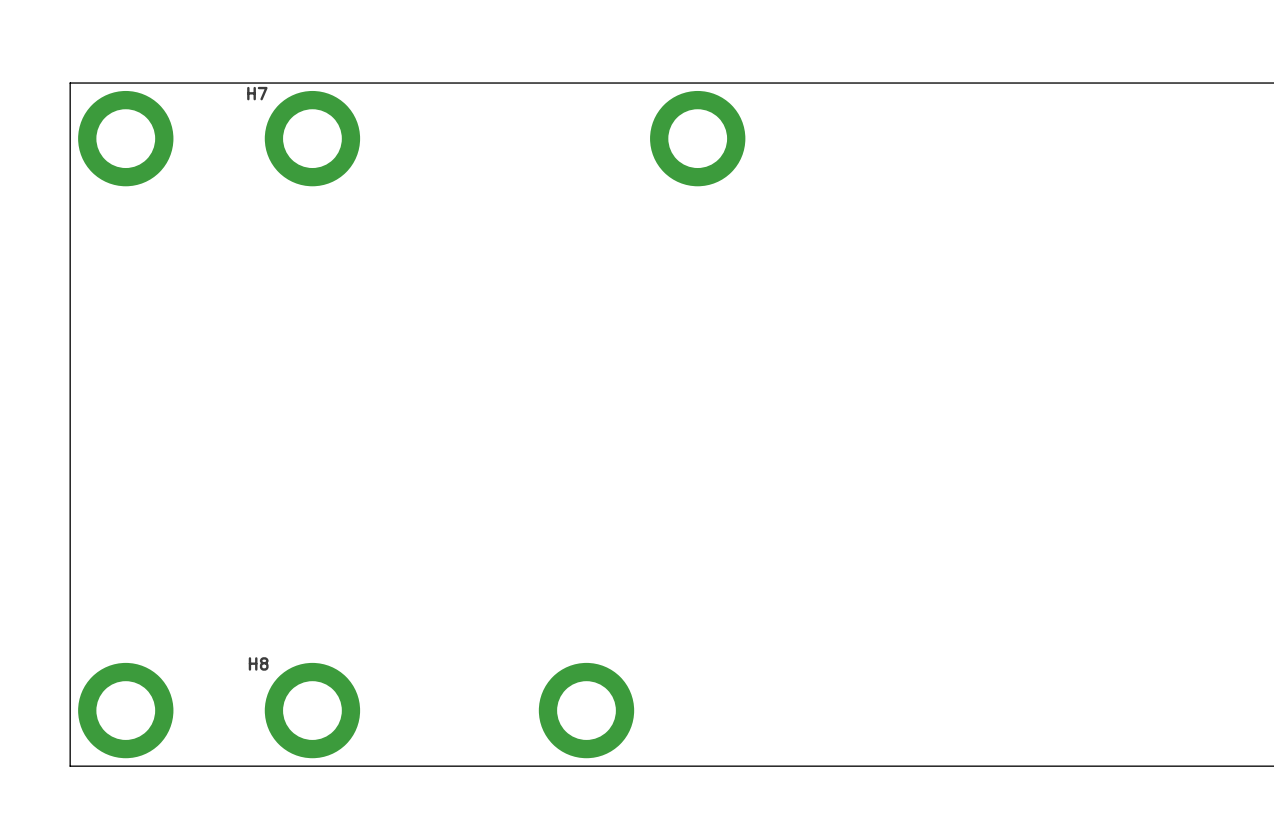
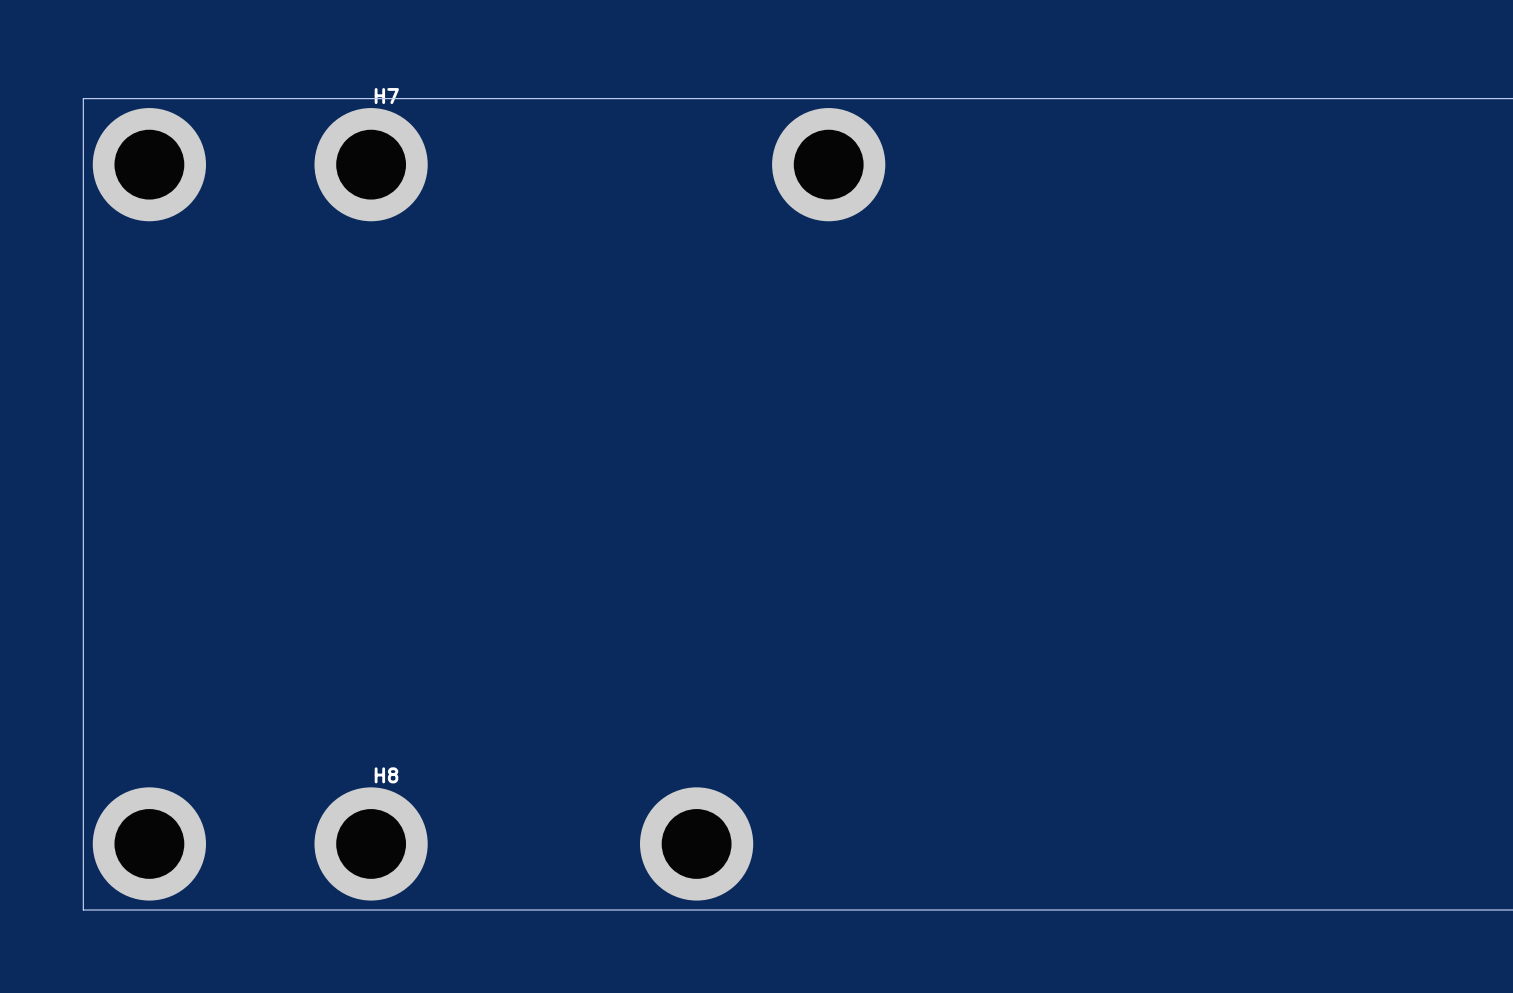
H7 name position: H7 (257, 93) -> H7 (386, 96)
H8 name position: H8 (258, 663) -> H8 (386, 775)

